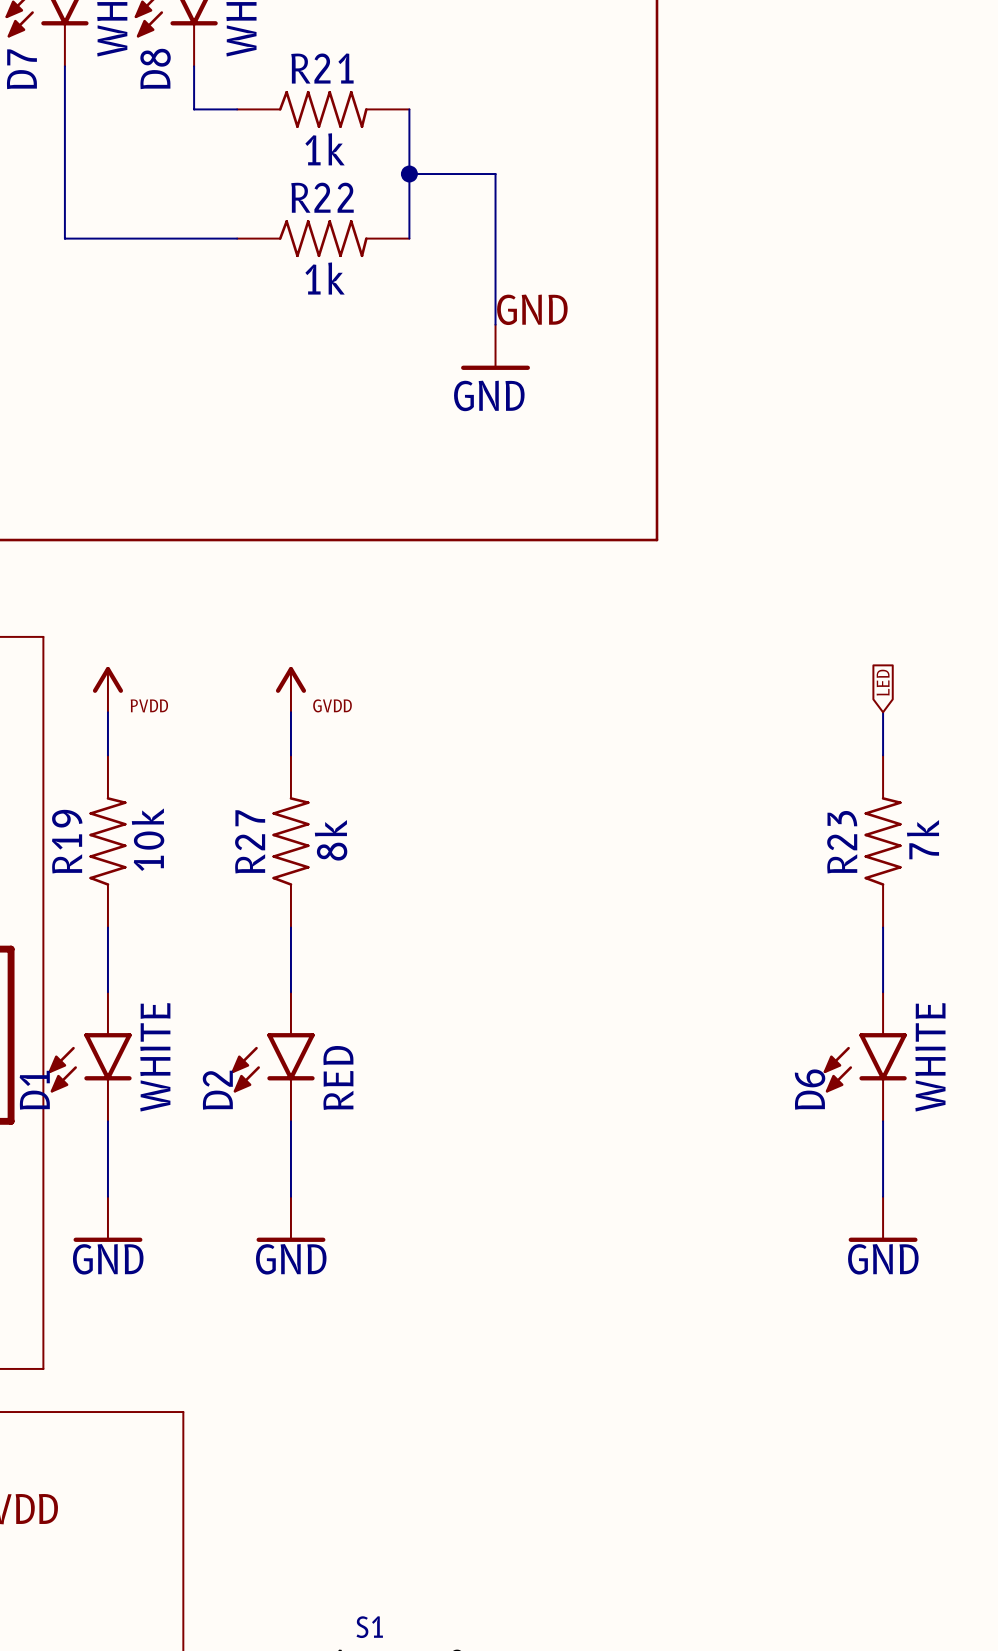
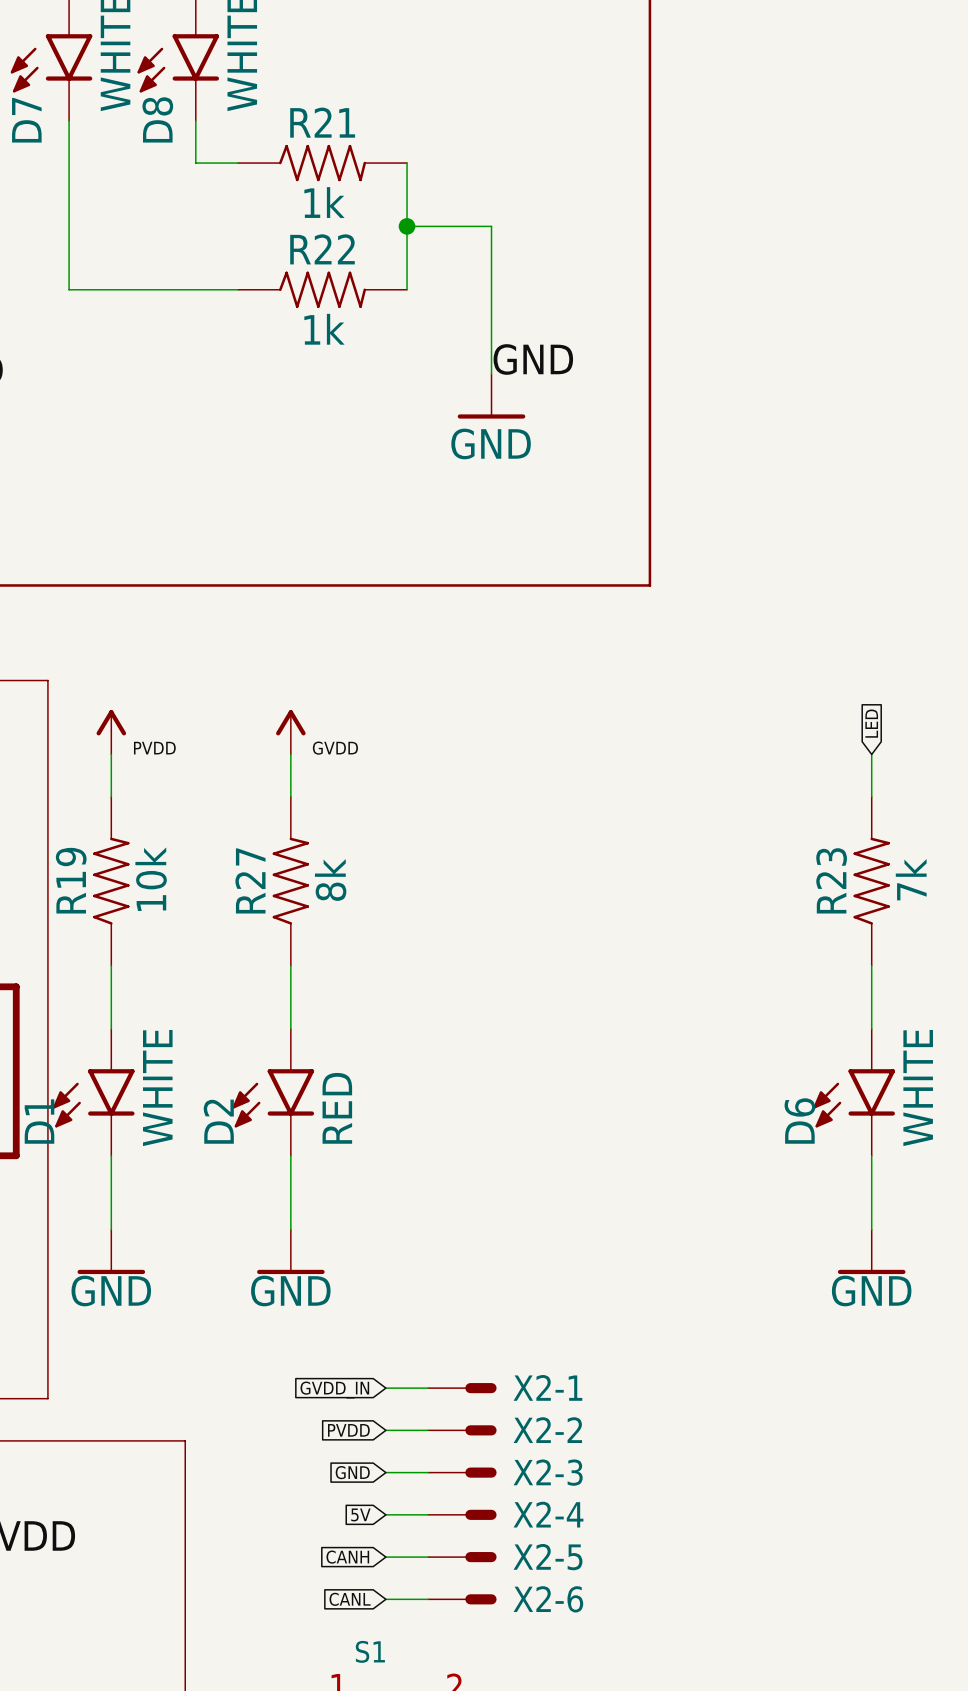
wire: none -> (385, 1388) (428, 1388)
X2-1: none -> (462, 1388)
global label: none -> GVDD_IN (334, 1390)
global label: none -> PVDD (348, 1430)
wire: none -> (385, 1430) (428, 1430)
X2-2: none -> (462, 1430)
global label: none -> GND (352, 1472)
wire: none -> (385, 1472) (428, 1472)
X2-3: none -> (462, 1472)
global label: none -> 5V (360, 1514)
wire: none -> (385, 1514) (428, 1514)
X2-4: none -> (462, 1514)
global label: none -> CANH (347, 1557)
wire: none -> (385, 1557) (428, 1557)
X2-5: none -> (462, 1557)
global label: none -> CANL (350, 1599)
wire: none -> (385, 1599) (428, 1599)
X2-6: none -> (462, 1599)

